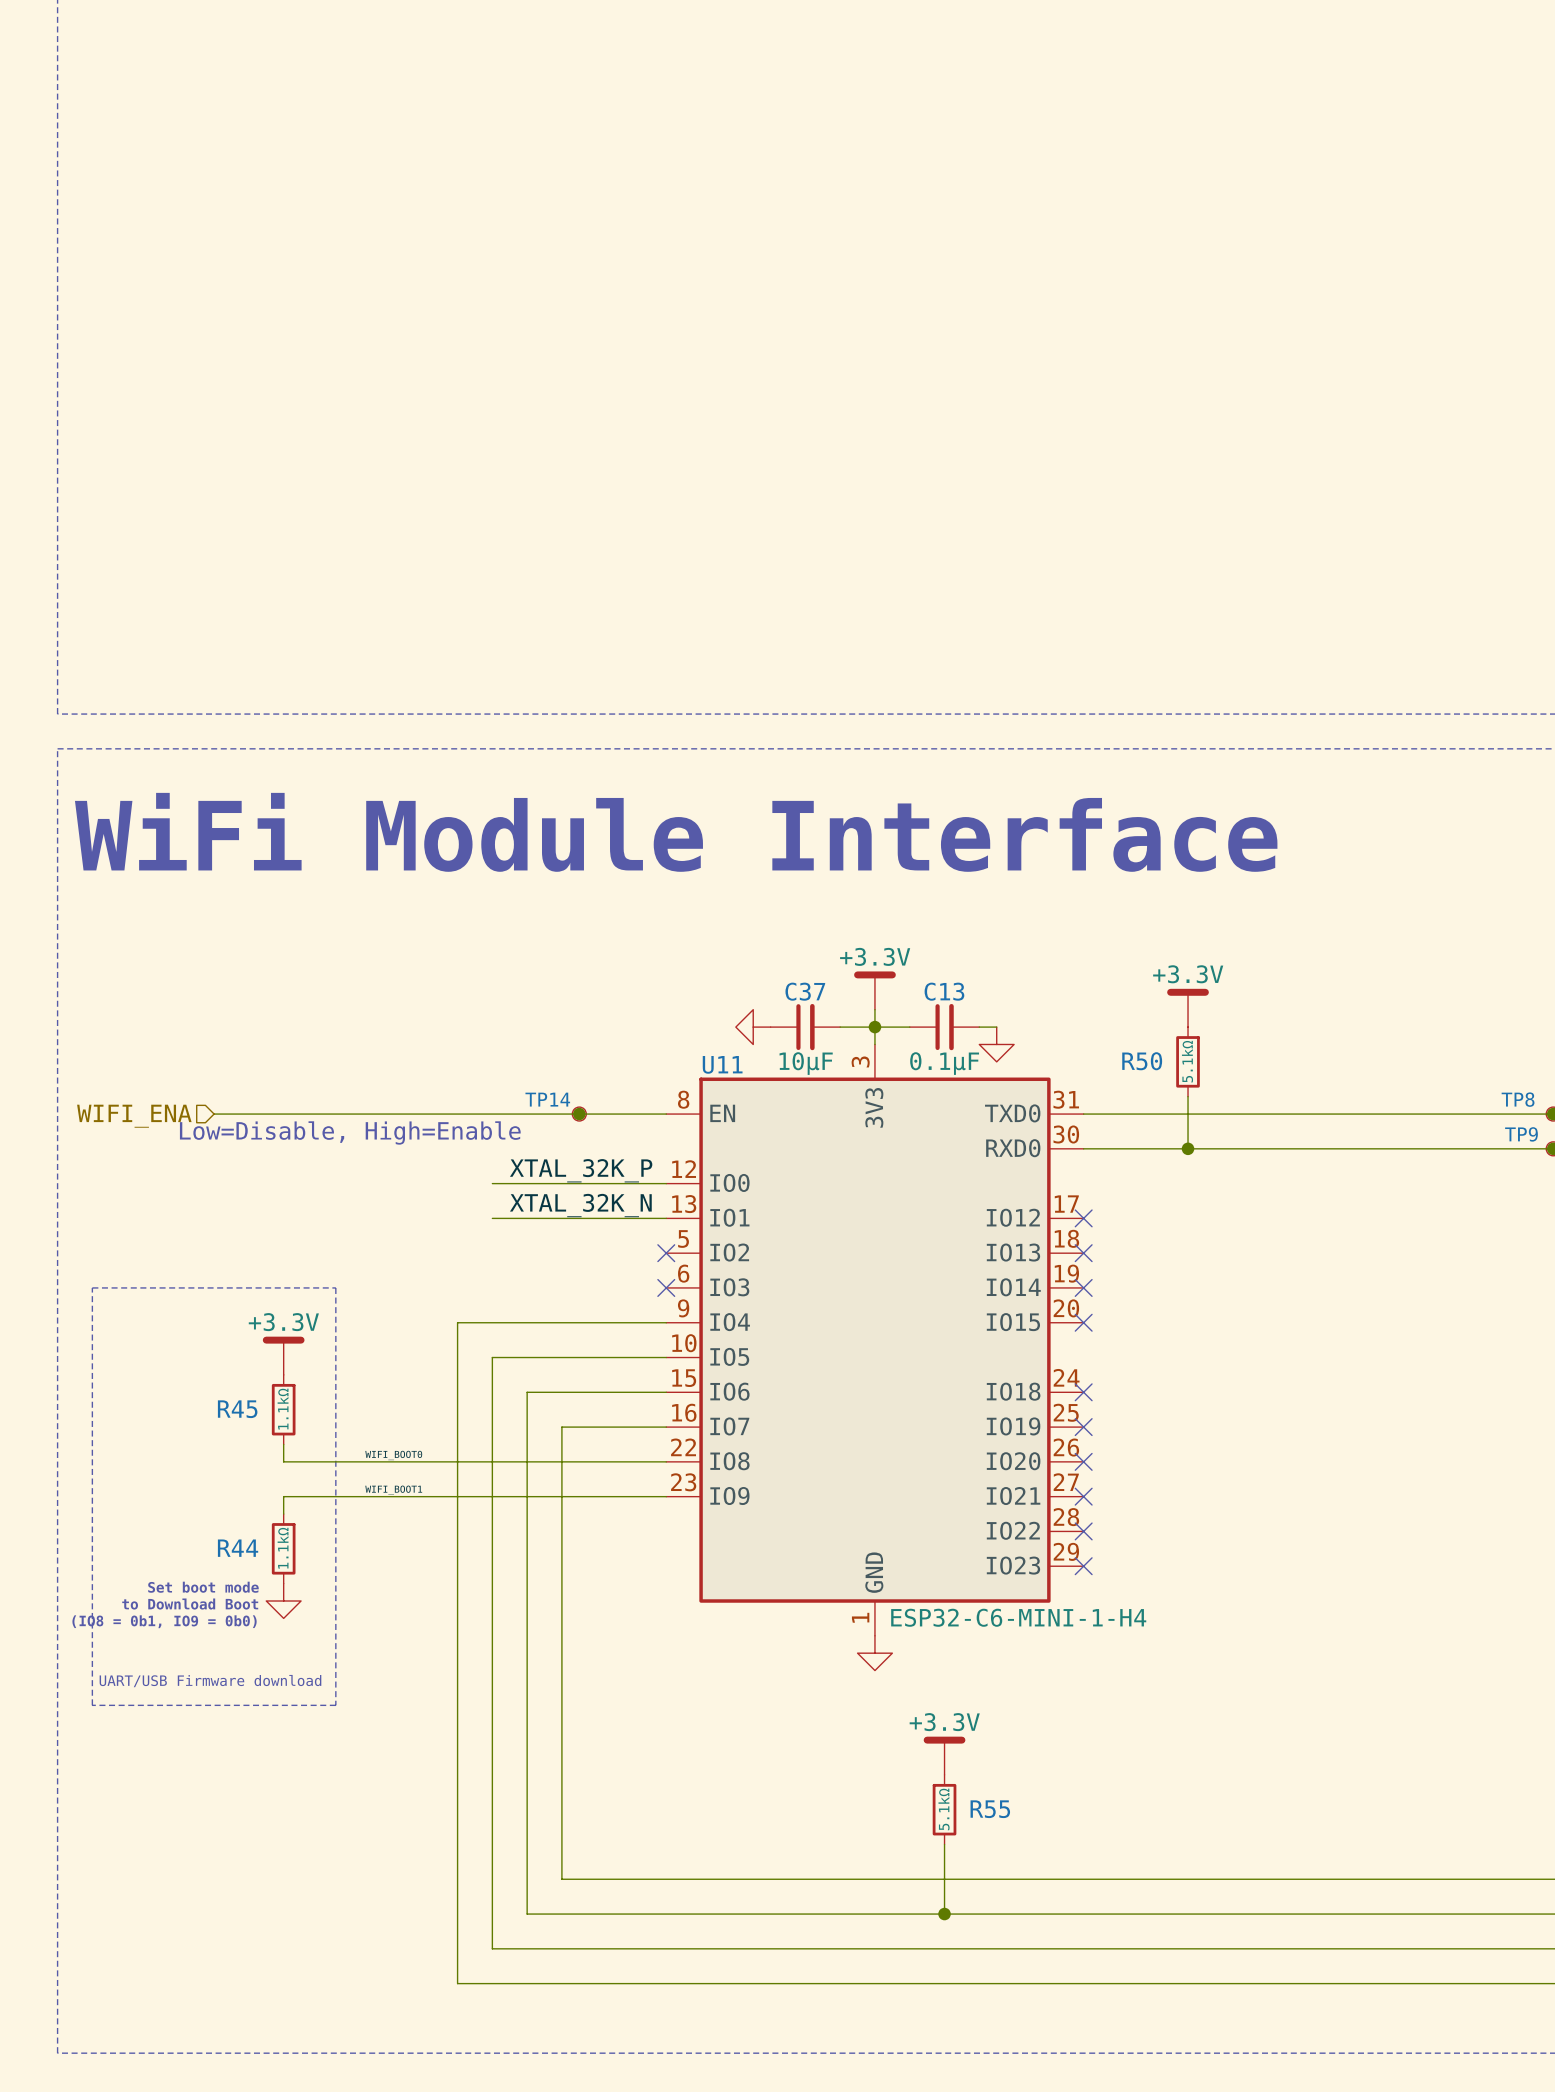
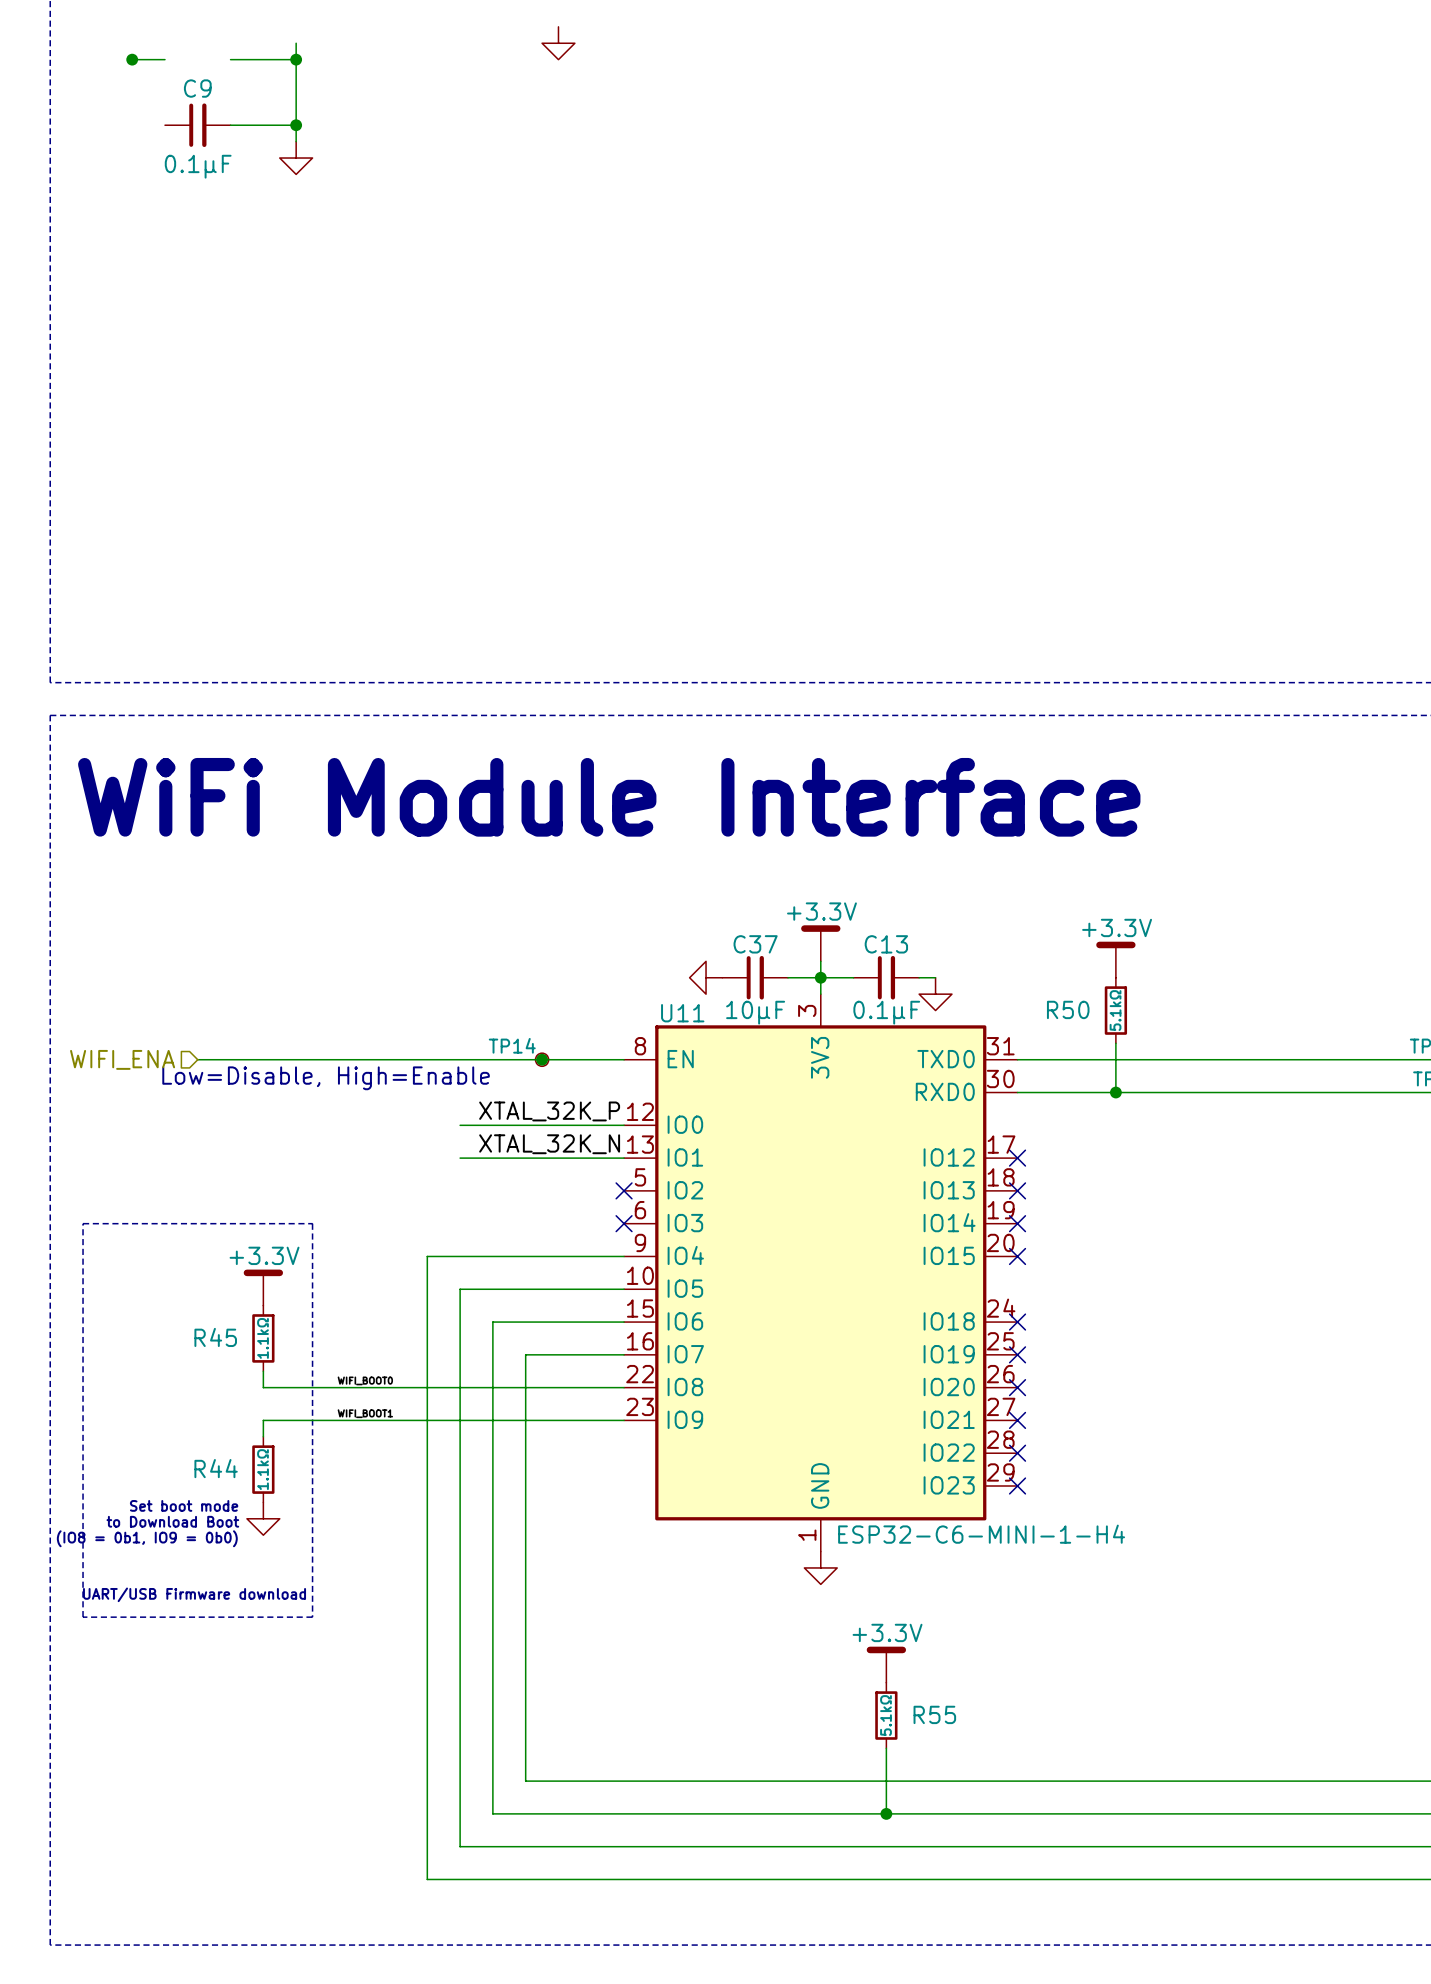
wire: none -> (296, 43) (296, 141)
power symbol: none -> (558, 43)
wire: none -> (132, 59) (164, 59)
junction: none -> (132, 59)
wire: none -> (230, 59) (296, 59)
junction: none -> (296, 59)
C9: none -> 0.1µF (197, 125)
wire: none -> (230, 125) (296, 125)
junction: none -> (296, 125)
power symbol: none -> (296, 158)

